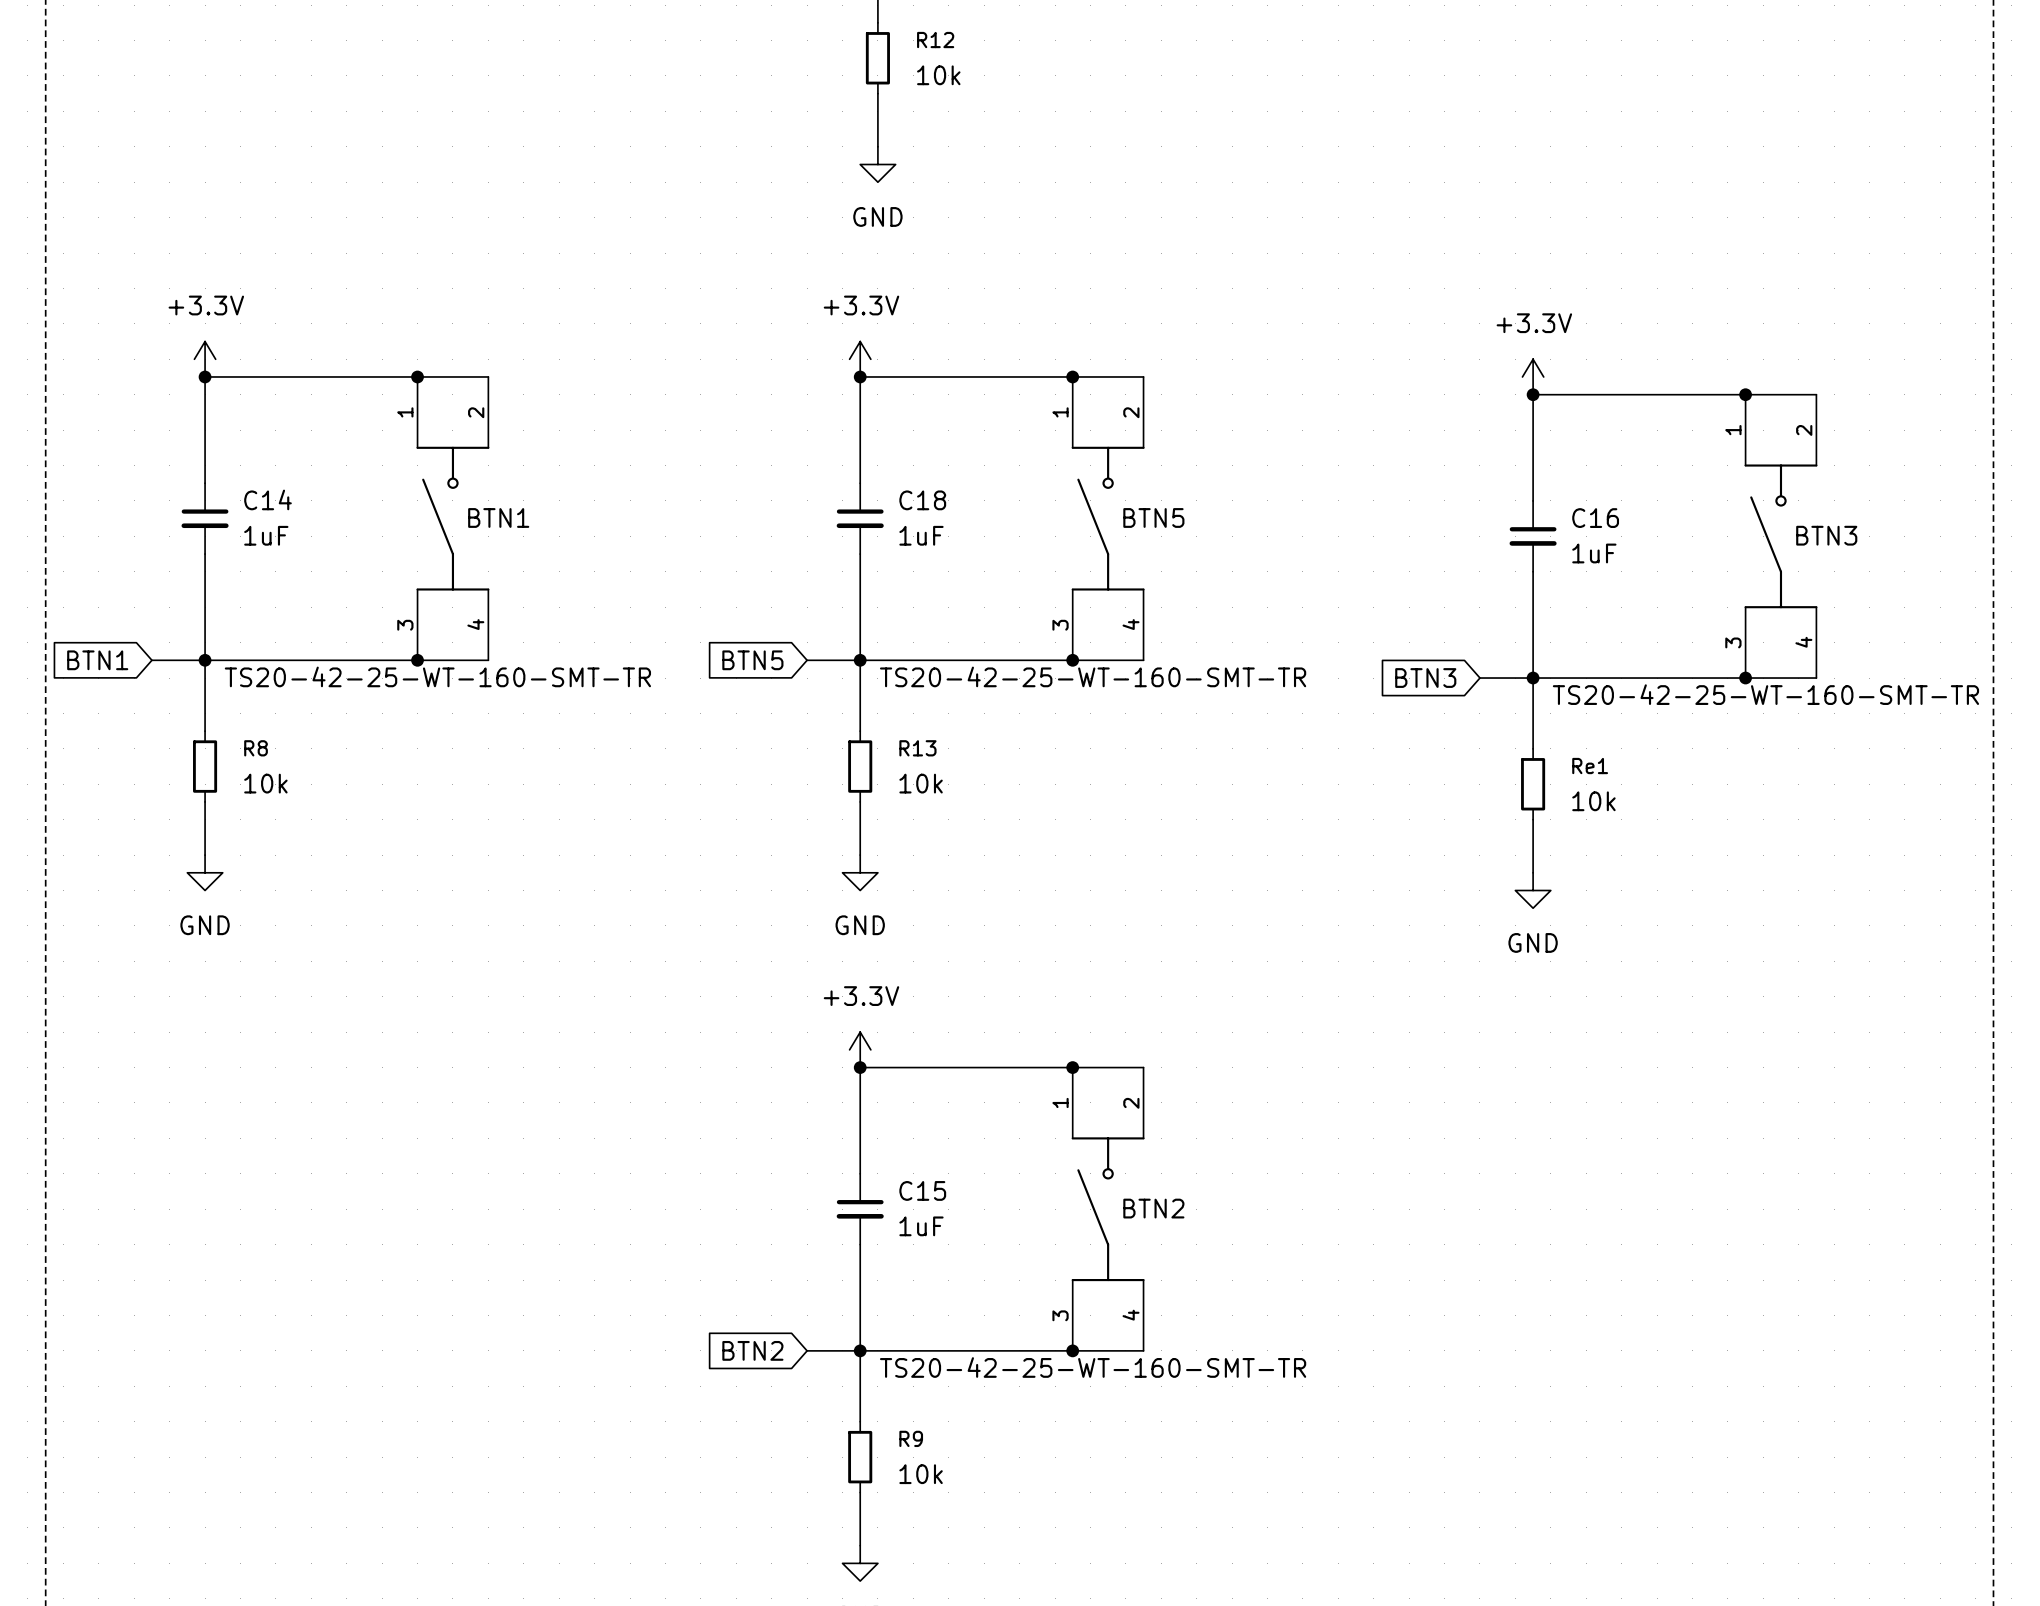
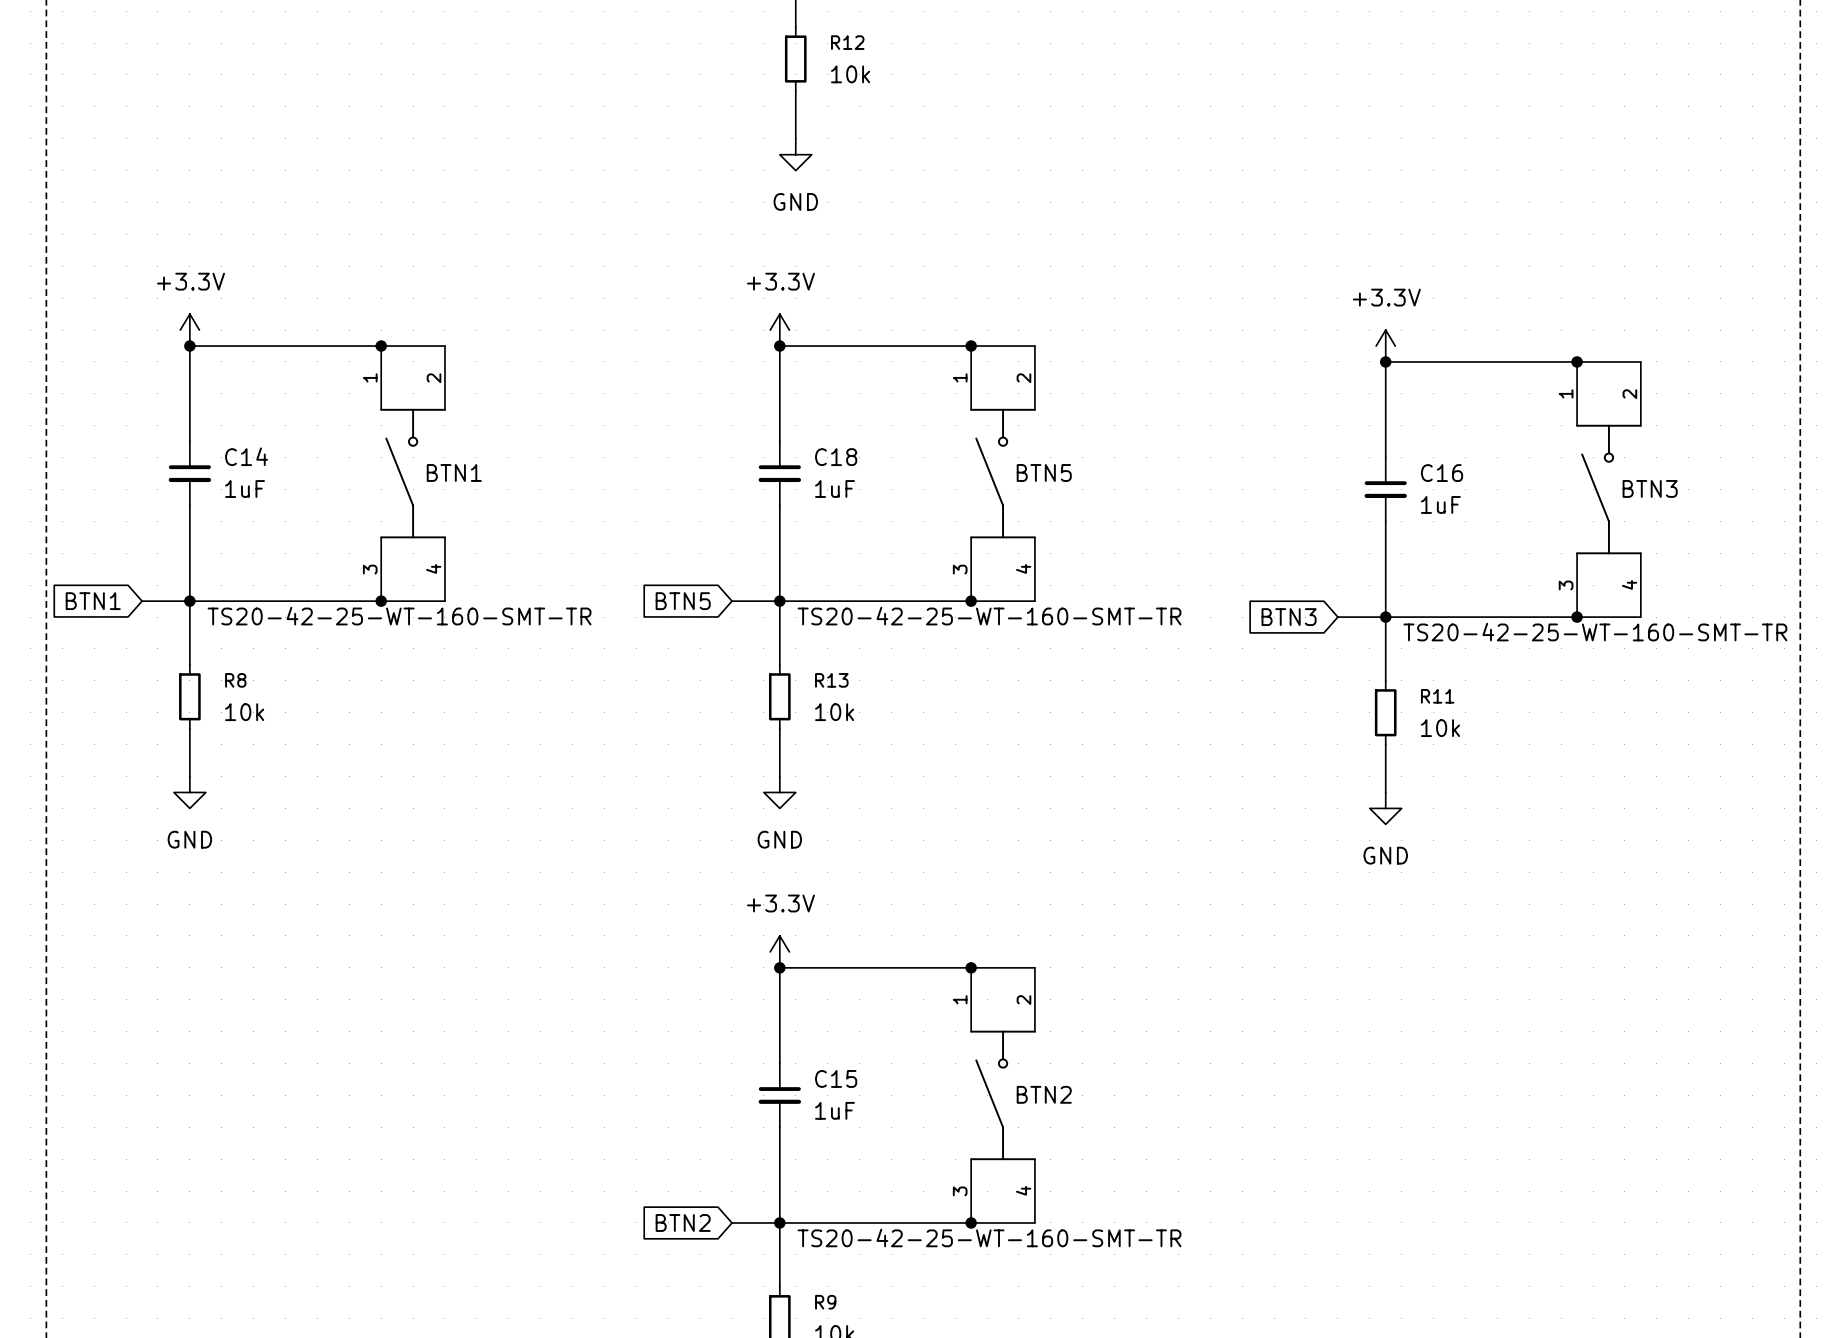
Re1 name: Re1 (1590, 766) -> R11 (1437, 696)

